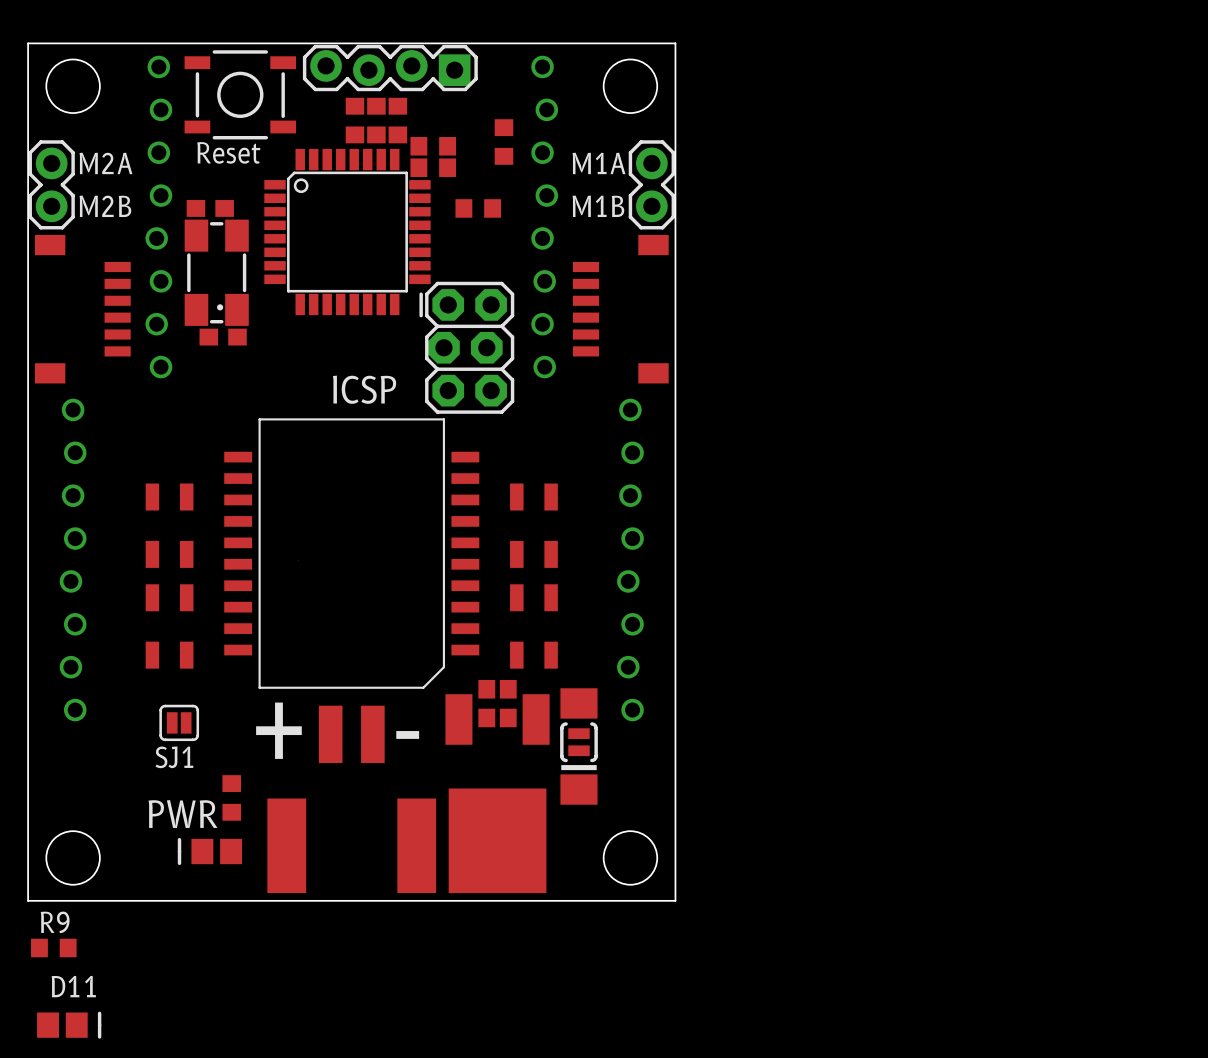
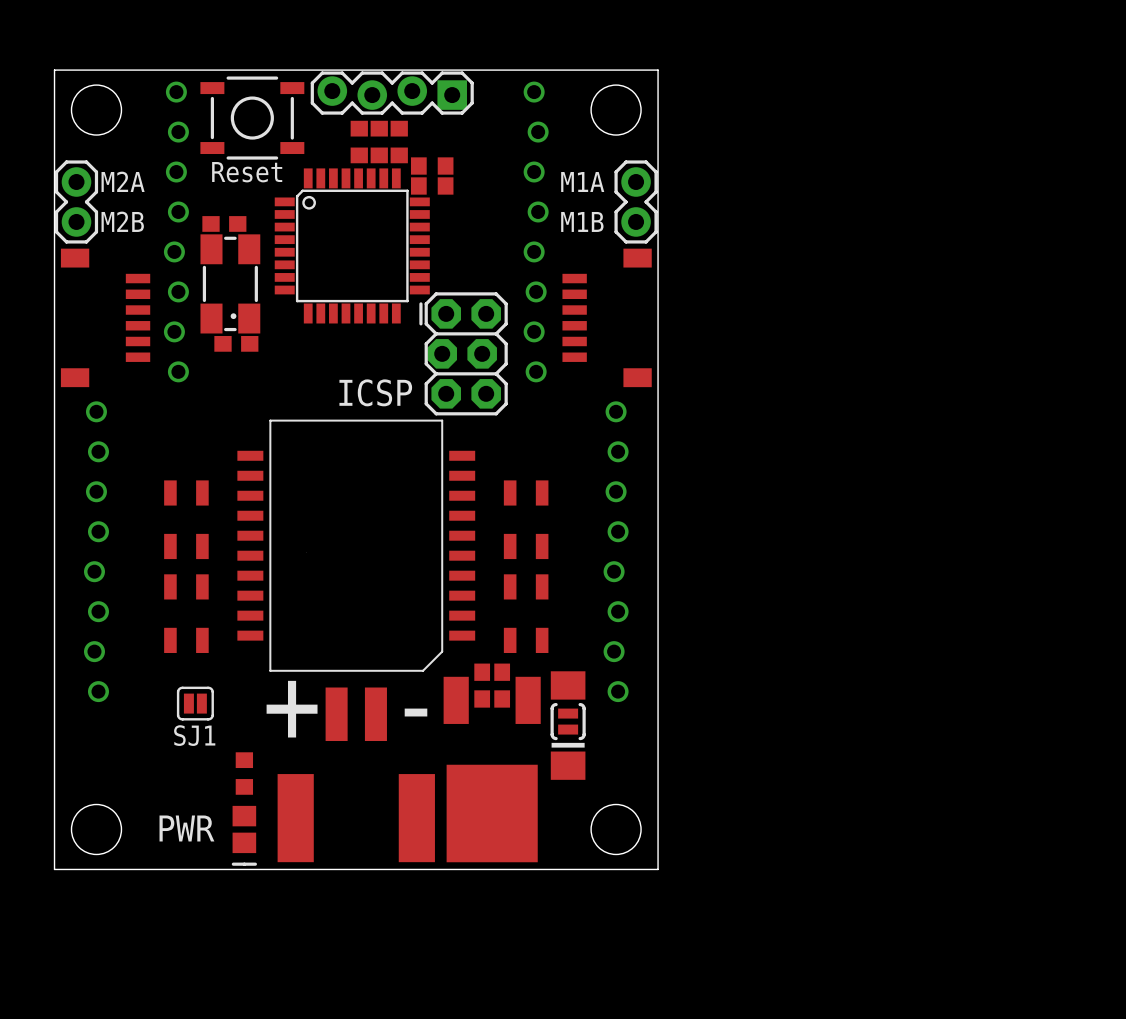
part: (503, 142) -> none
part: (478, 208) -> none
text position: PWR (183, 814) -> PWR (186, 828)
part rotation: 0° (209, 851) -> 90° counterclockwise (244, 835)
R9: (53, 947) -> none
D11: (69, 1025) -> none

